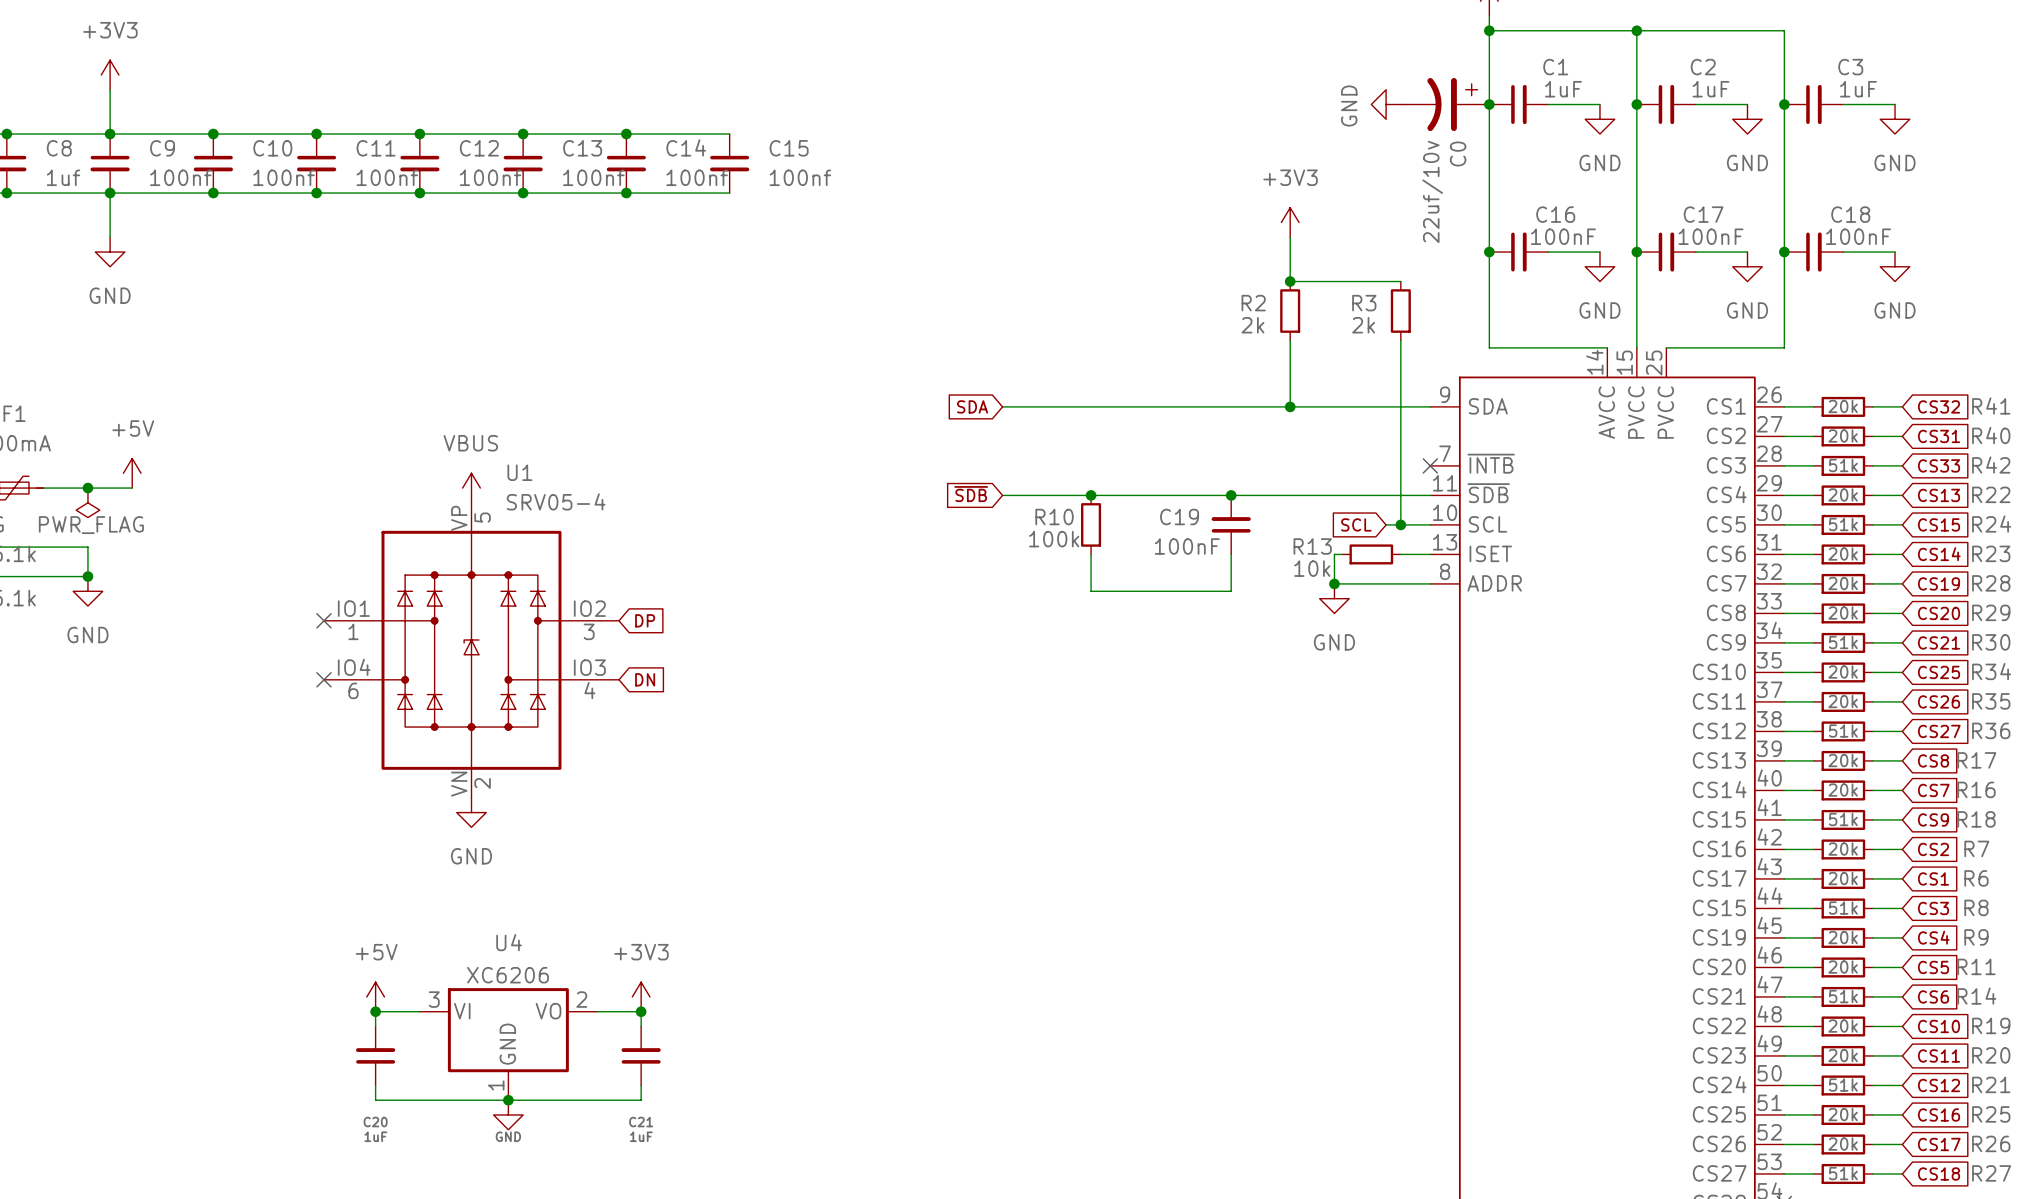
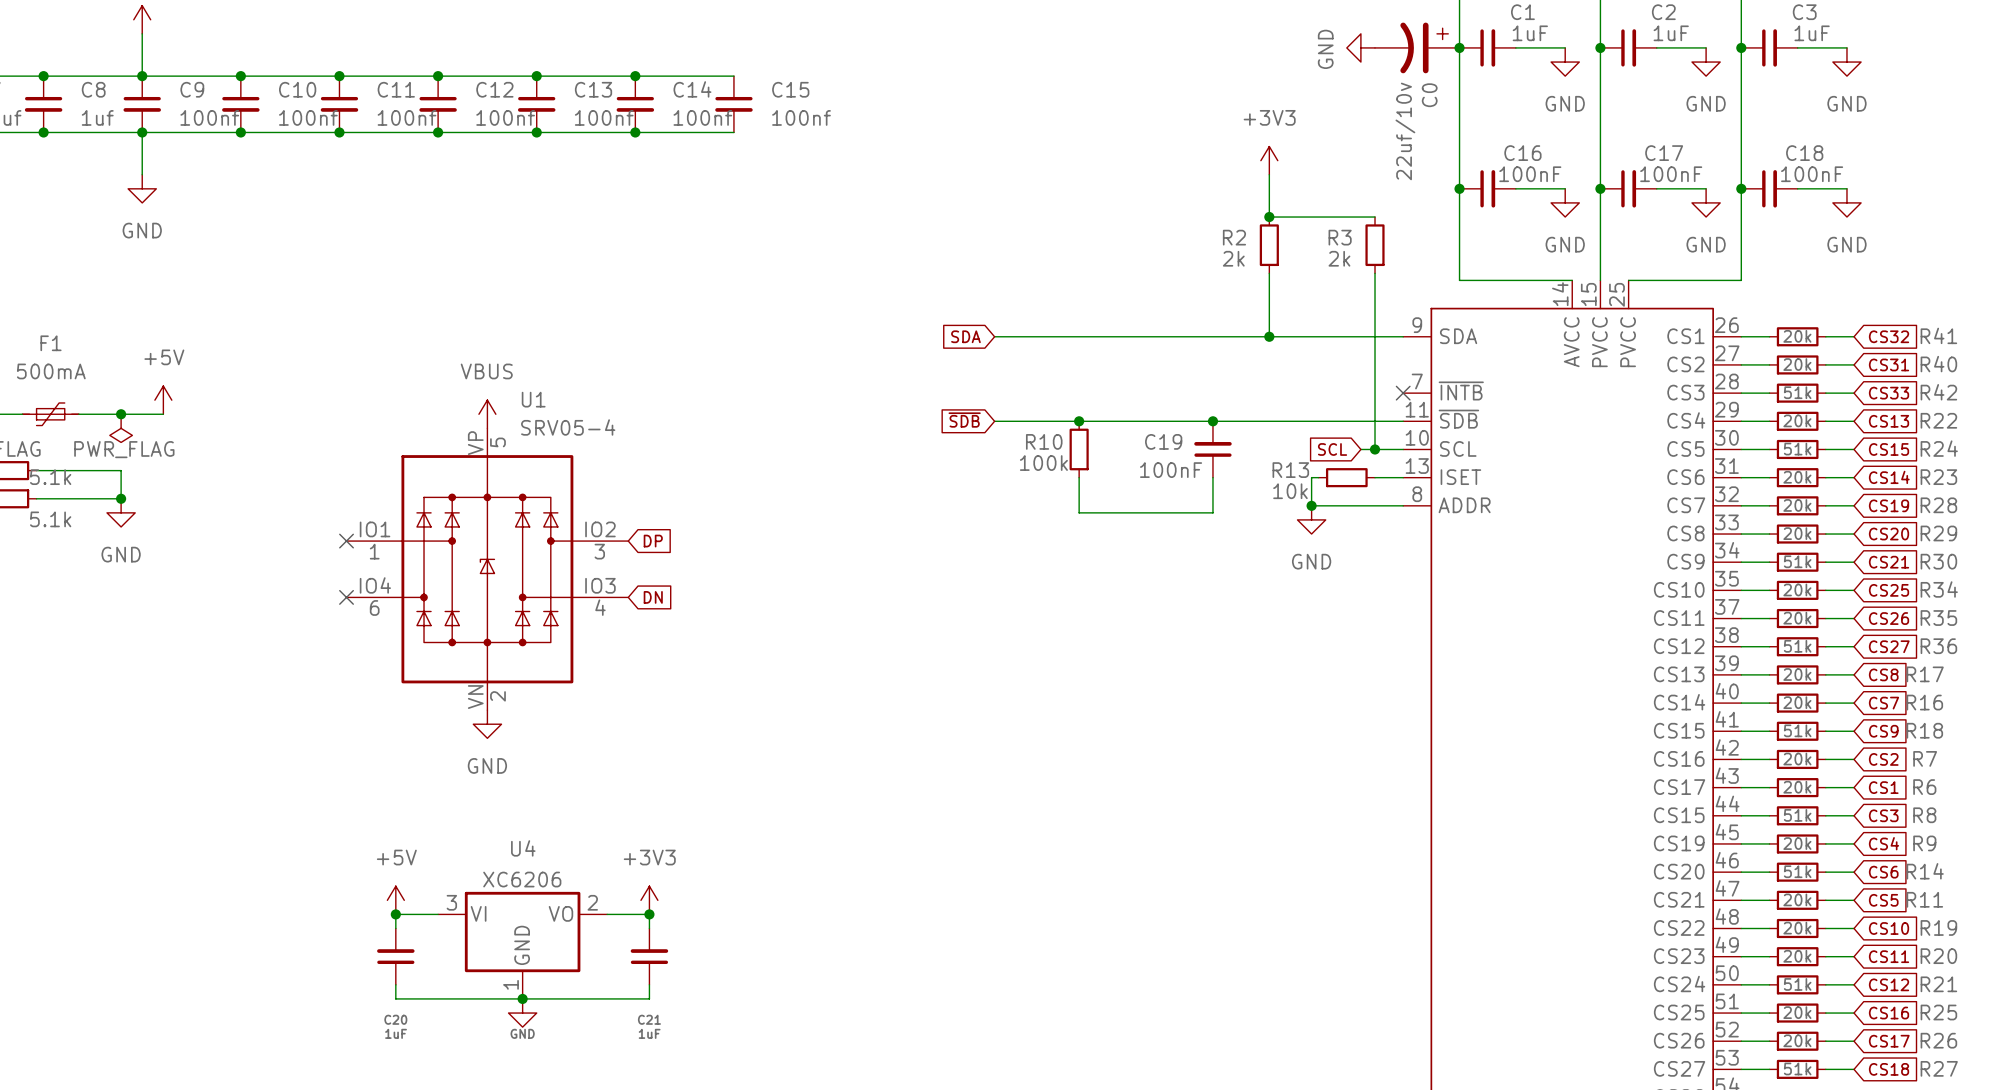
R11 name: R11 (1976, 966) -> R14 (1925, 871)
R11 value: 20k (1843, 967) -> 51k (1797, 871)
global label: CS5 (1933, 967) -> CS6 (1883, 872)
R14 value: 51k (1843, 996) -> 20k (1797, 899)
global label: CS6 (1933, 996) -> CS5 (1883, 900)
R14 name: R14 (1976, 996) -> R11 (1924, 899)

